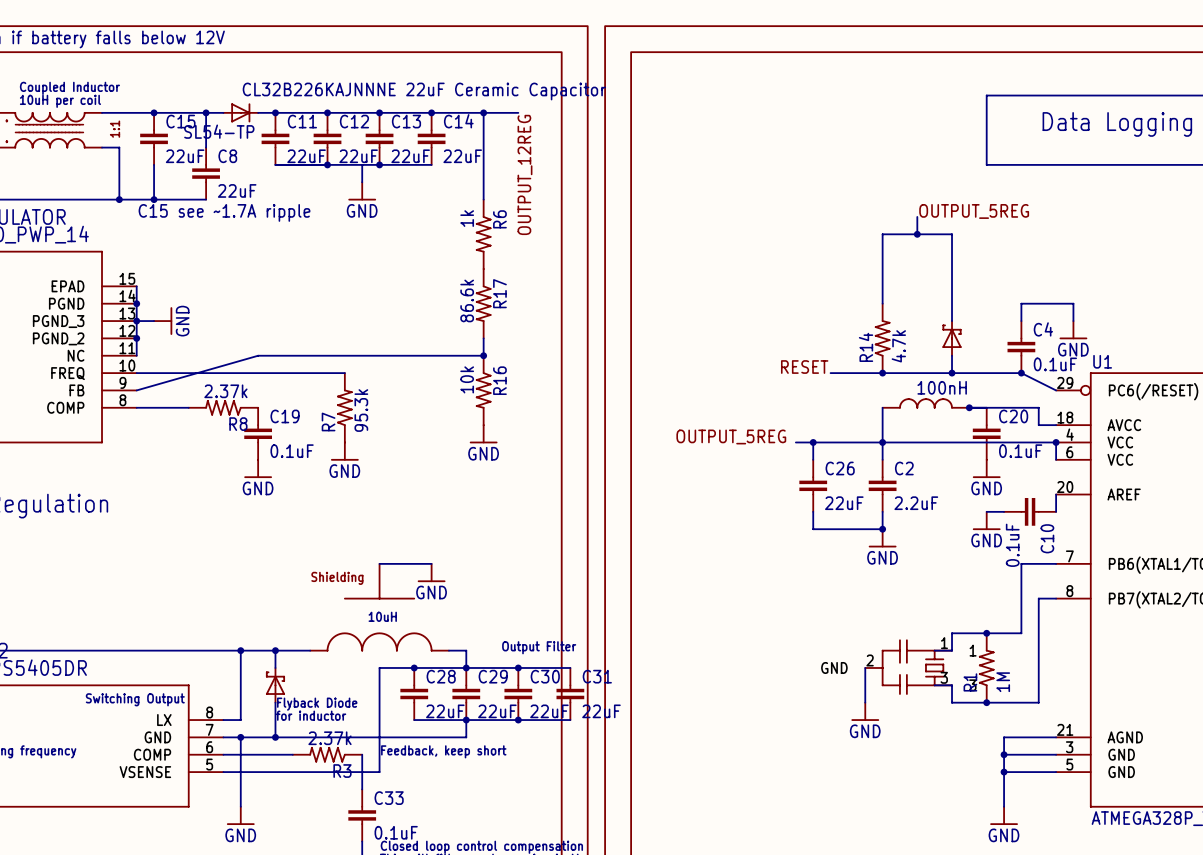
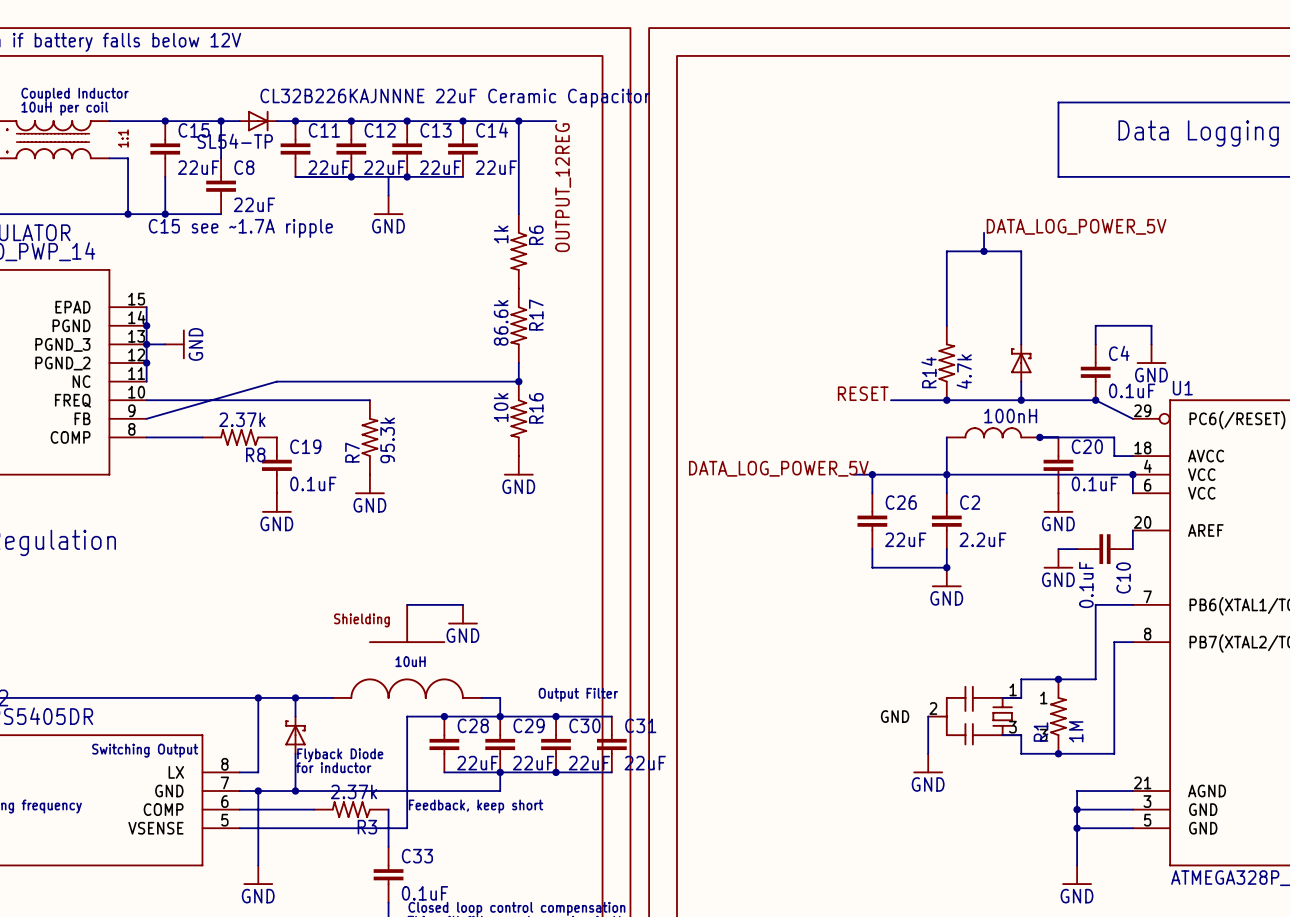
label: OUTPUT_5REG (974, 211) -> DATA_LOG_POWER_5V (1076, 226)
label: none -> DATA_LOG_POWER_5V (778, 468)
label: OUTPUT_5REG (731, 436) -> none

